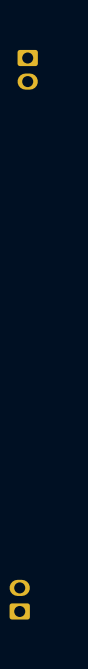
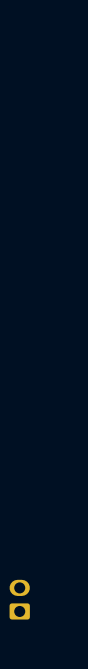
part: (27, 69) -> none

